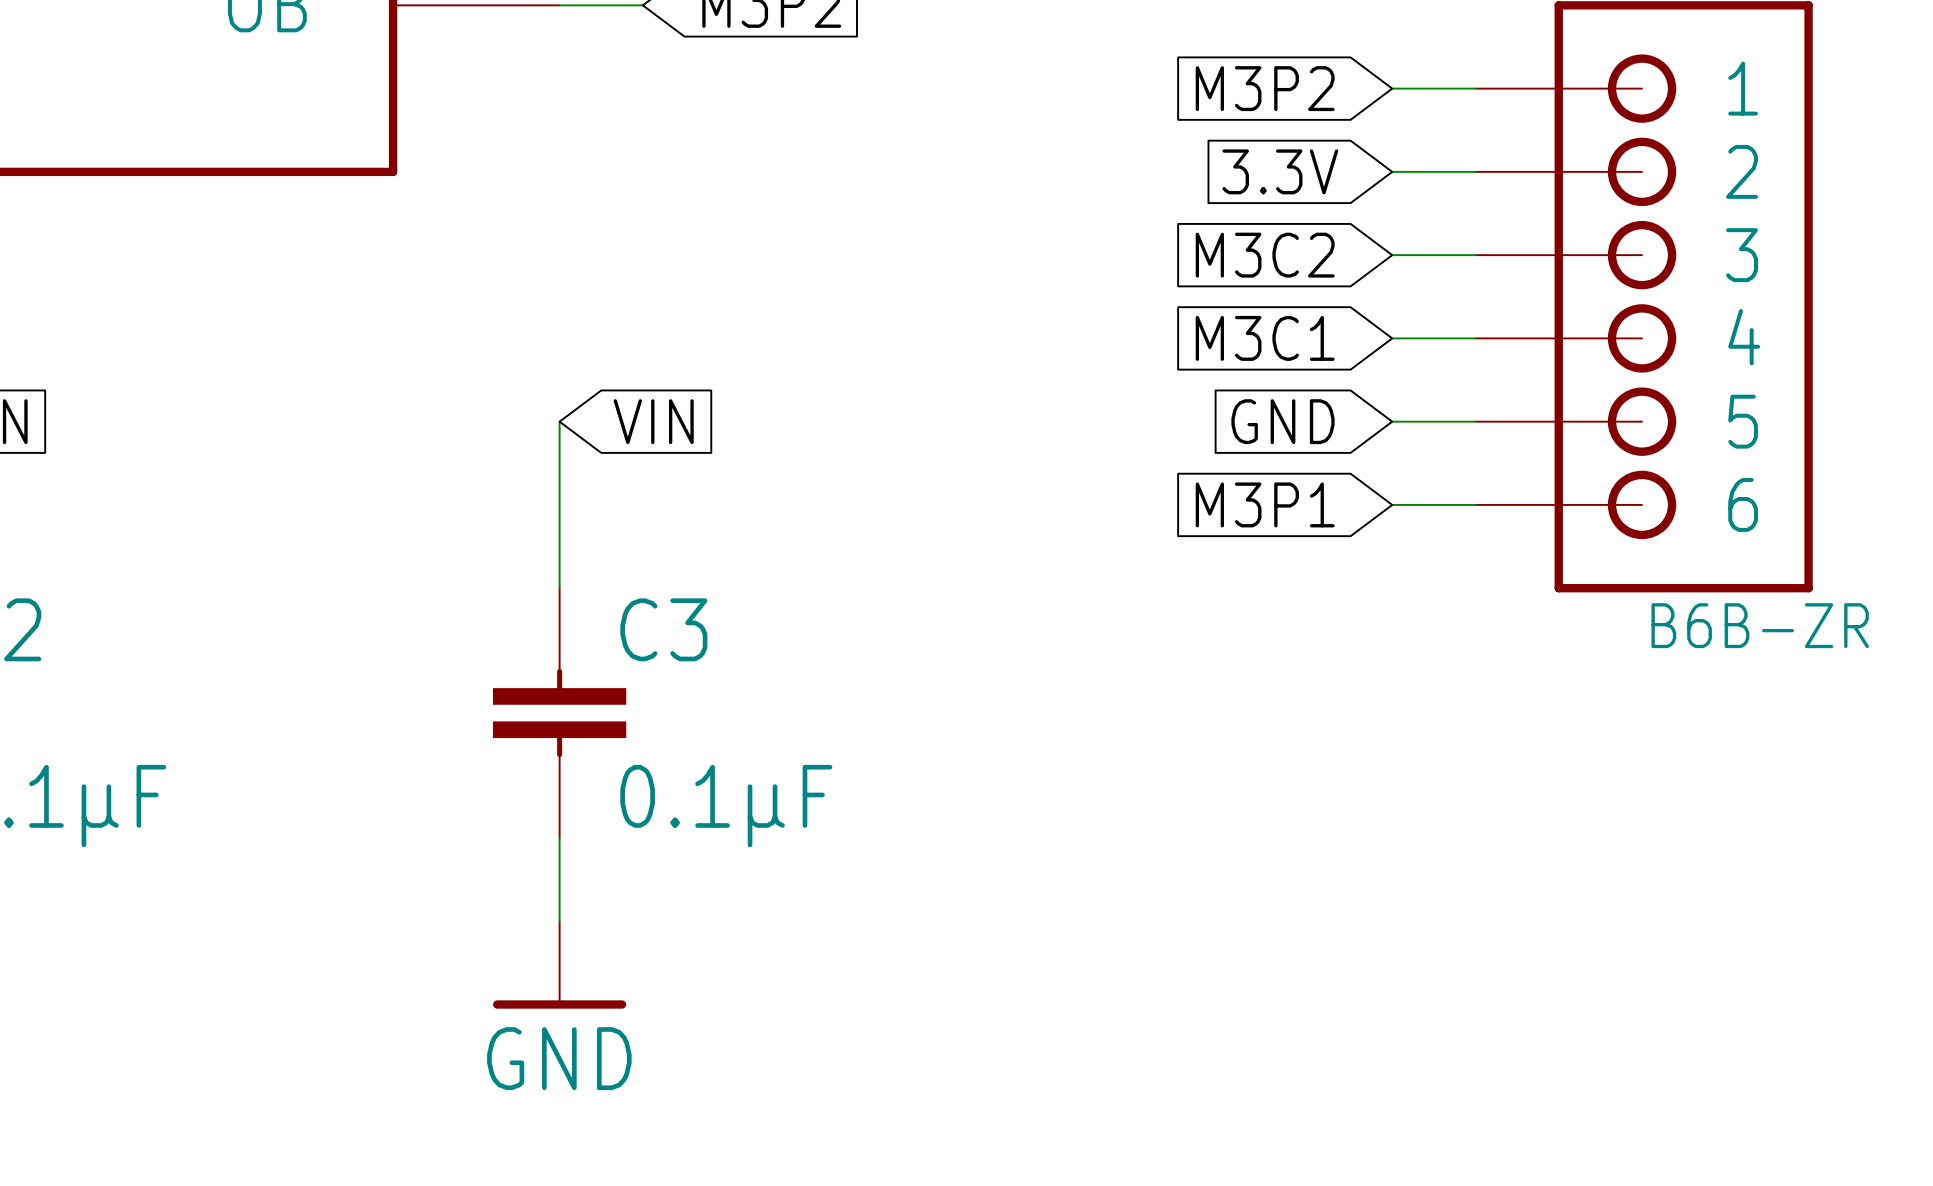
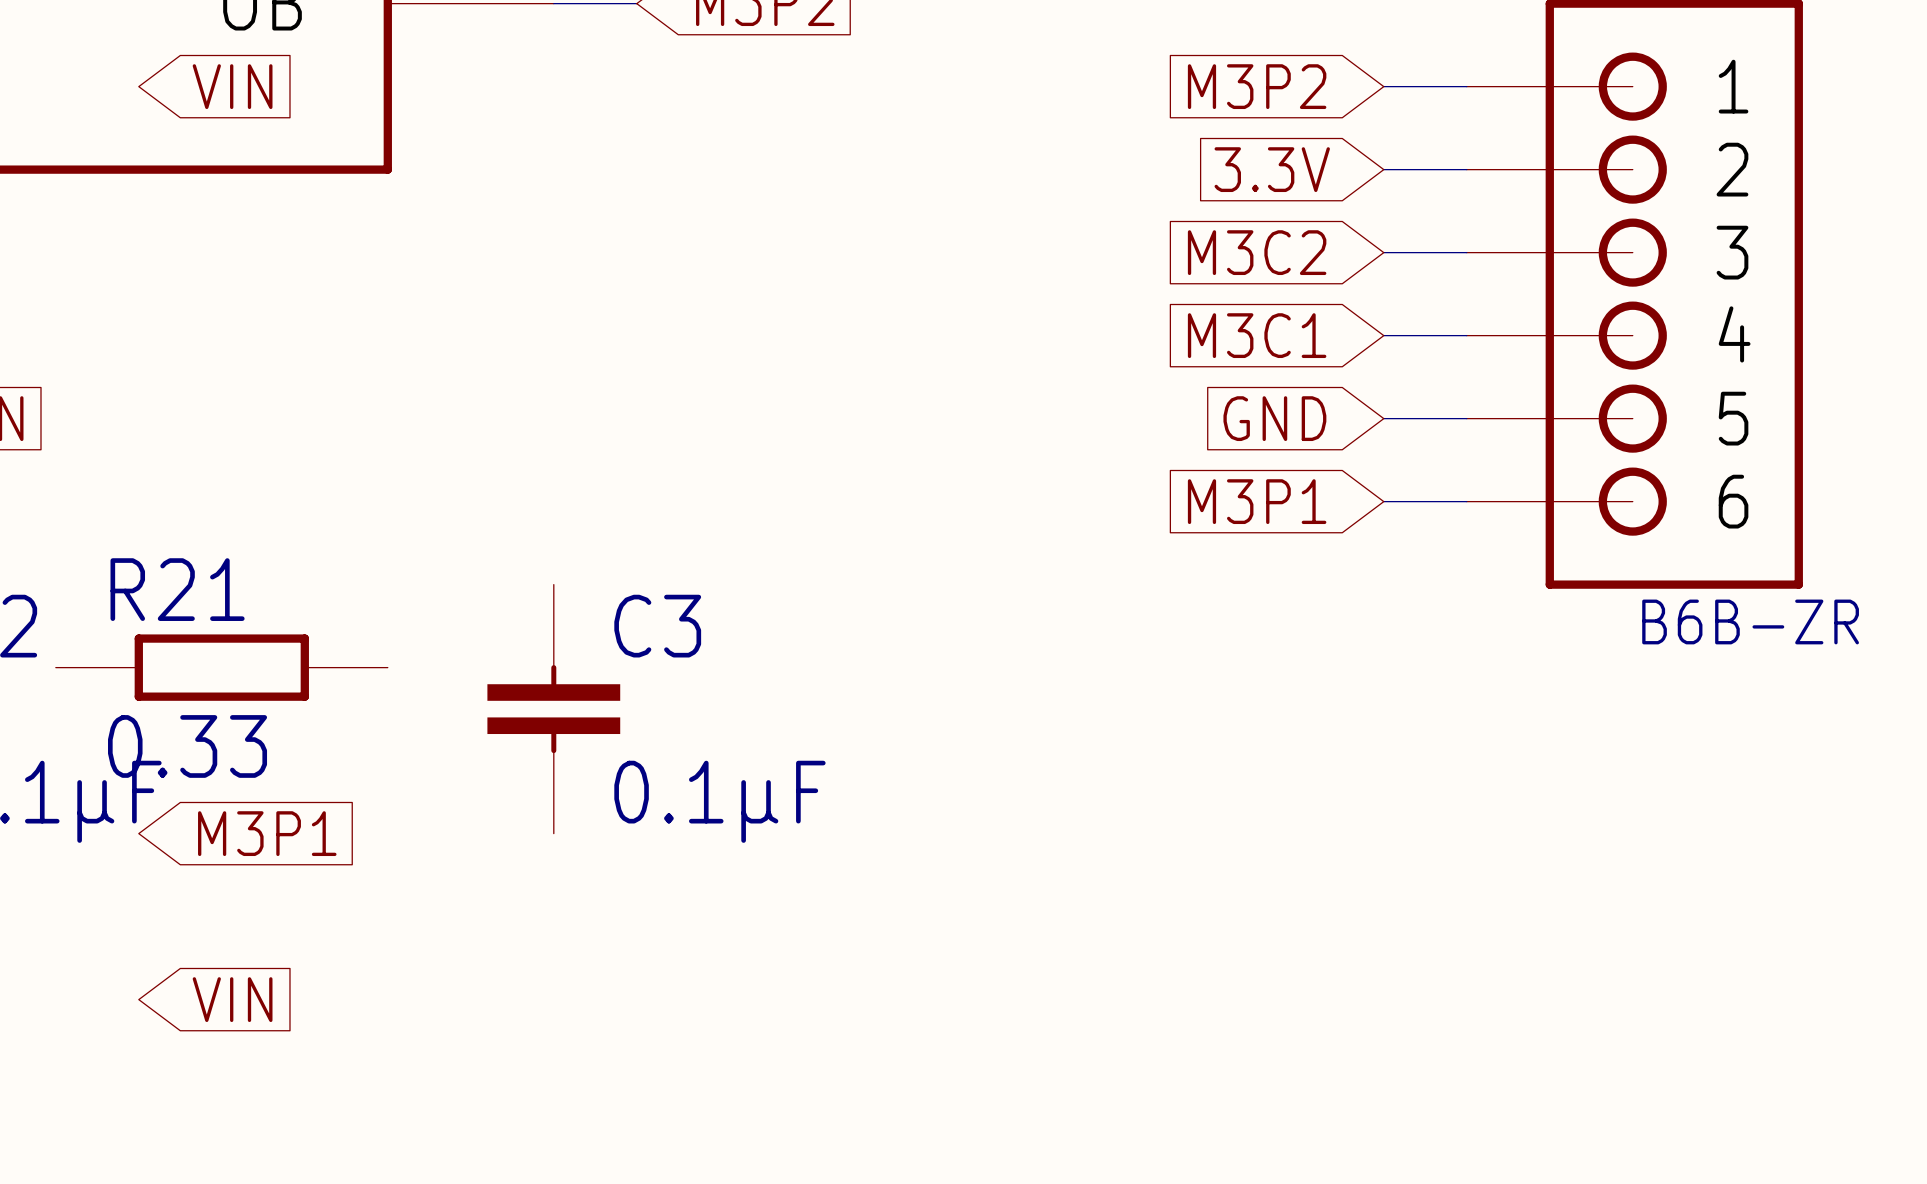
global label: none -> VIN (232, 86)
wire: (559, 421) (559, 588) -> none
global label: VIN (653, 421) -> none
R21: none -> 0.33 (221, 667)
global label: none -> M3P1 (267, 833)
wire: (559, 837) (559, 921) -> none
power symbol: GND (559, 964) -> none
global label: none -> VIN (232, 999)

